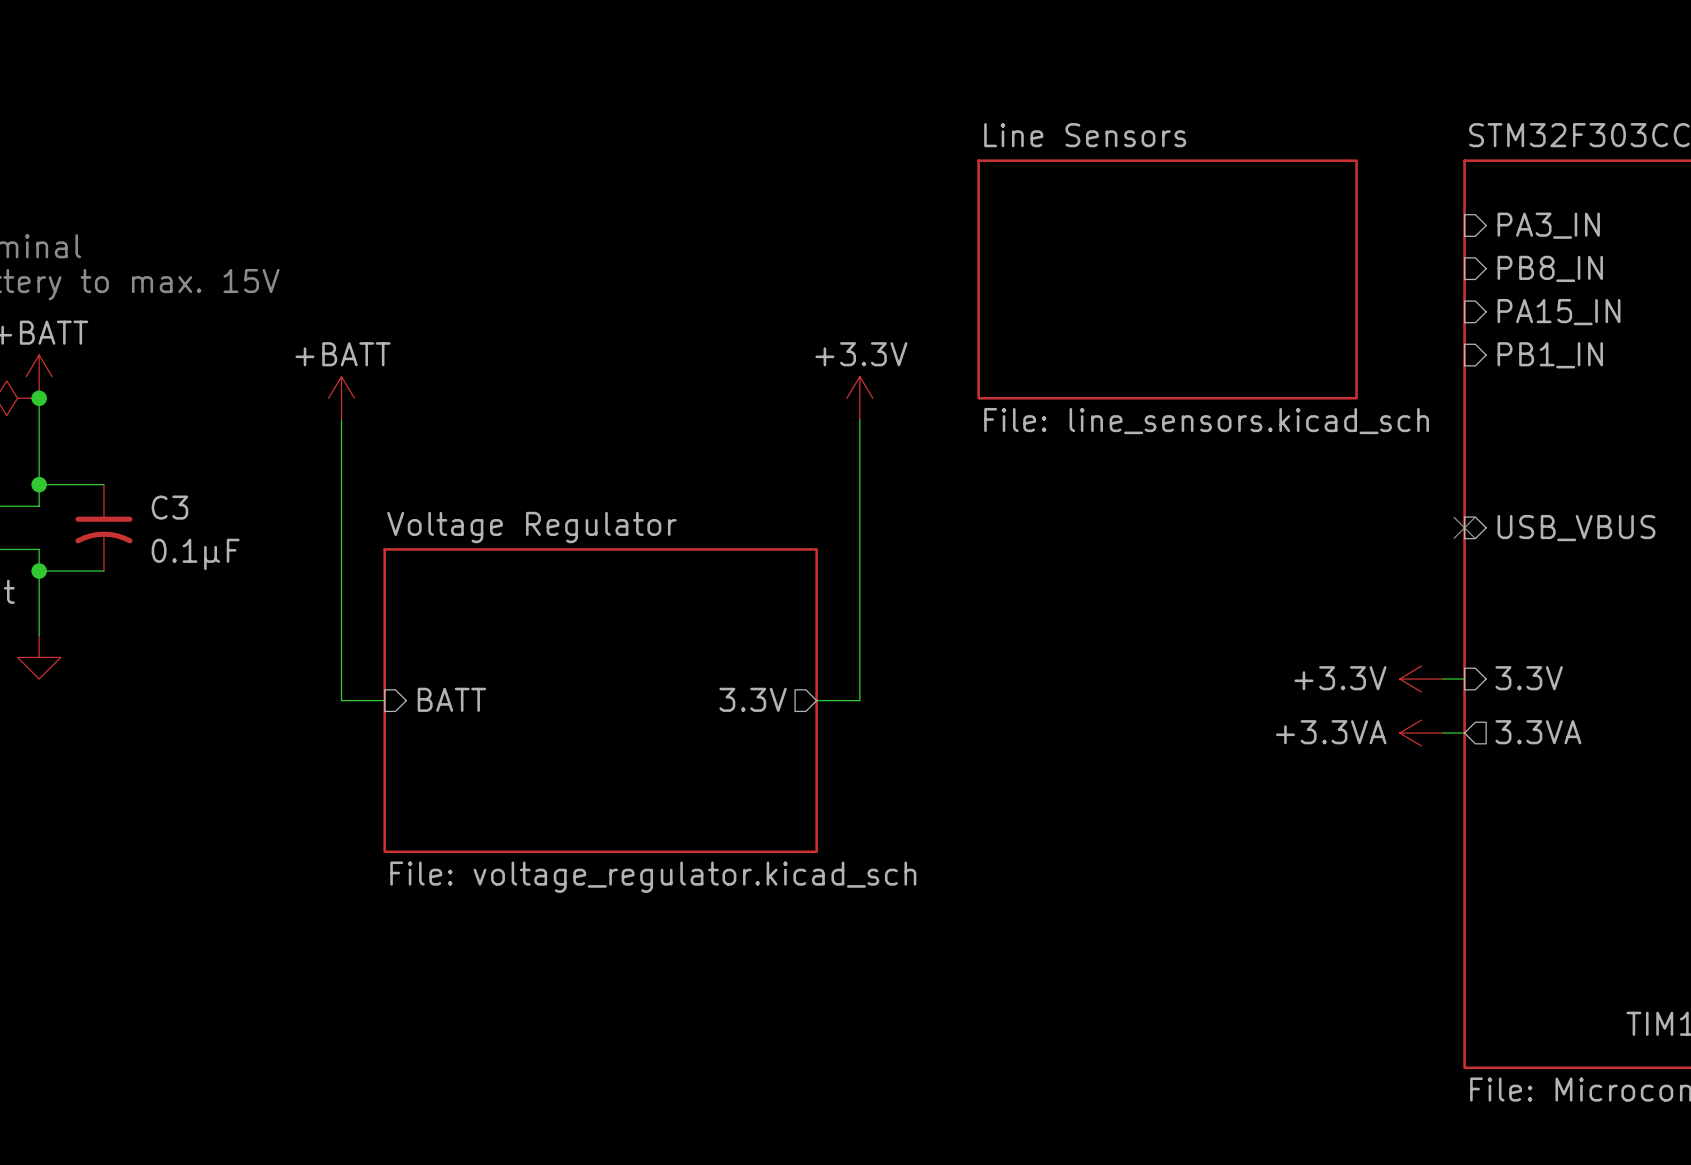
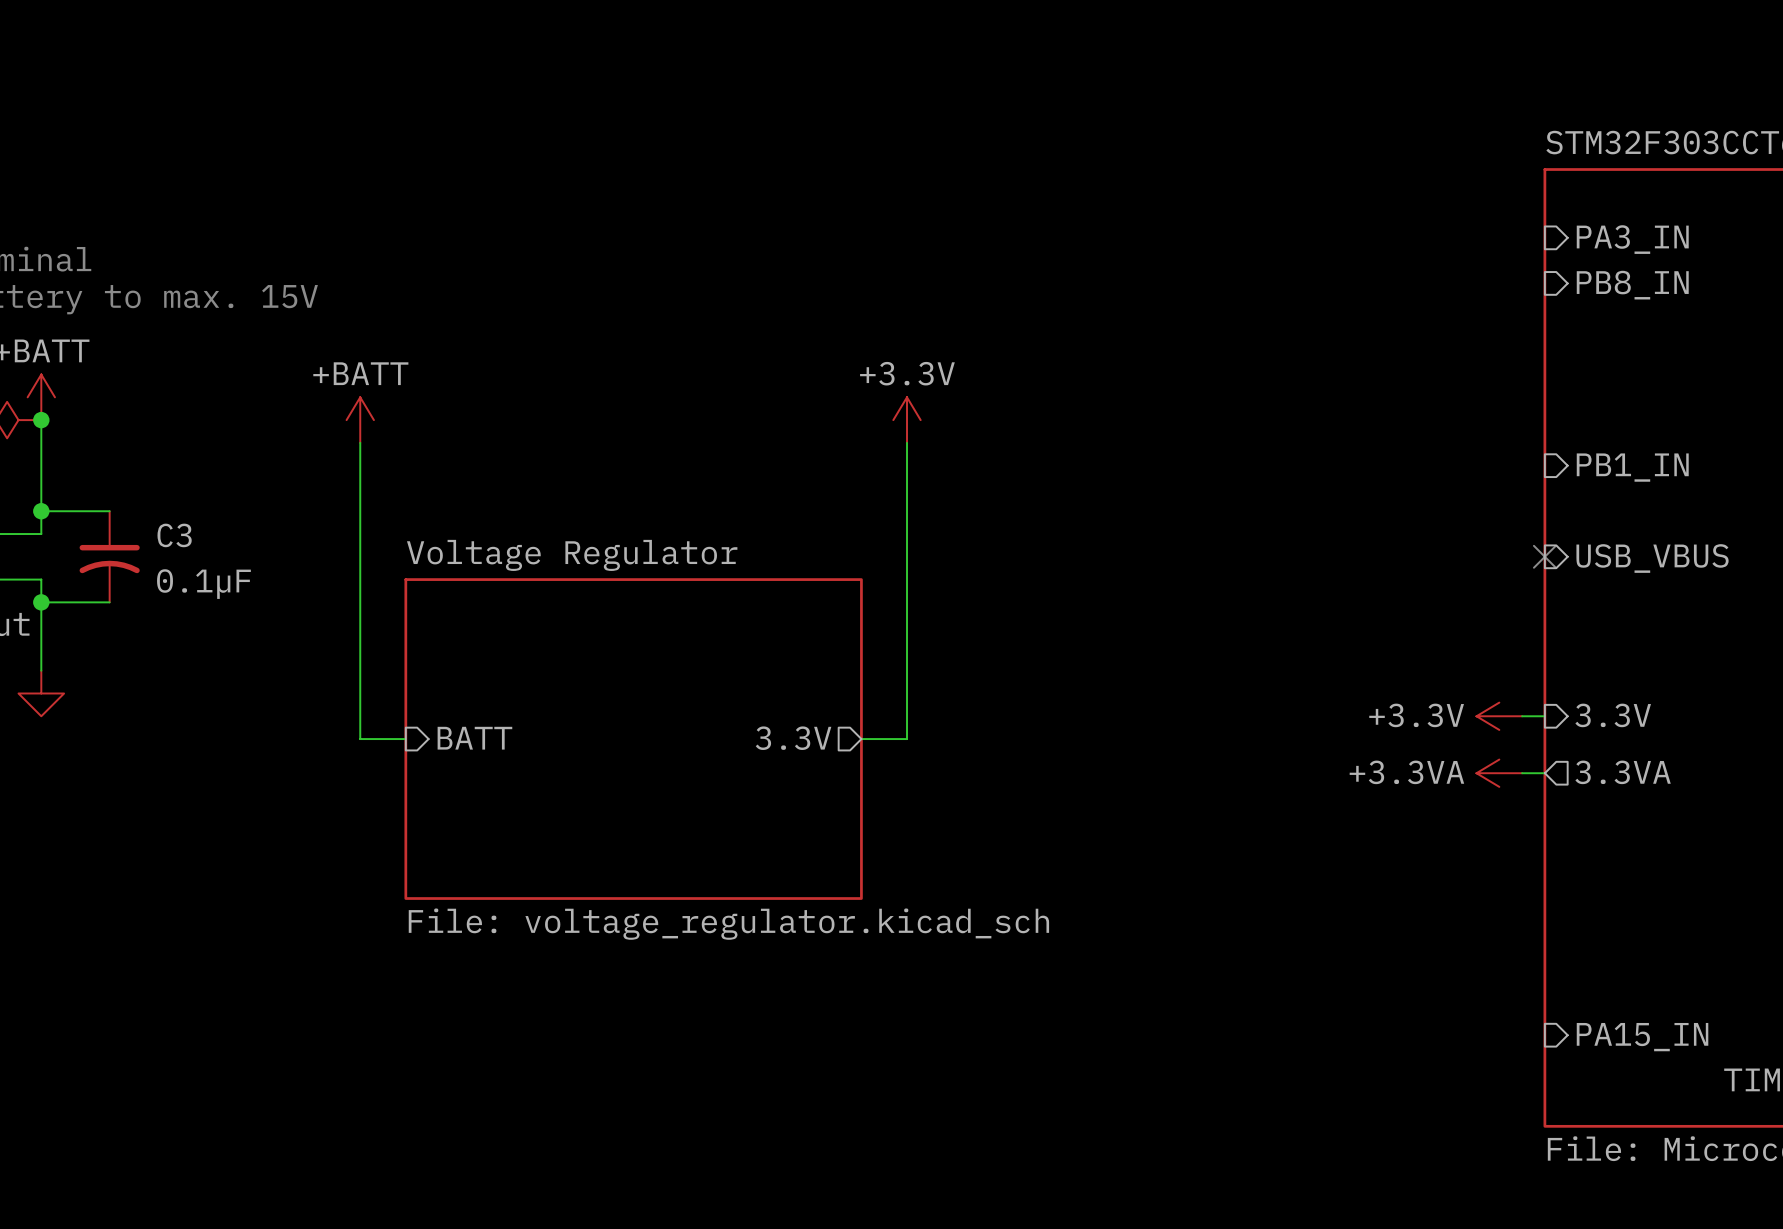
sheet Line Sensors: File: line_sensors.kicad_sch (1167, 279) -> none
sheet pin: PA15_IN (1559, 312) -> none
sheet pin position: PB1_IN (1550, 355) -> PB1_IN (1632, 467)
sheet pin: none -> PA15_IN (1642, 1037)

